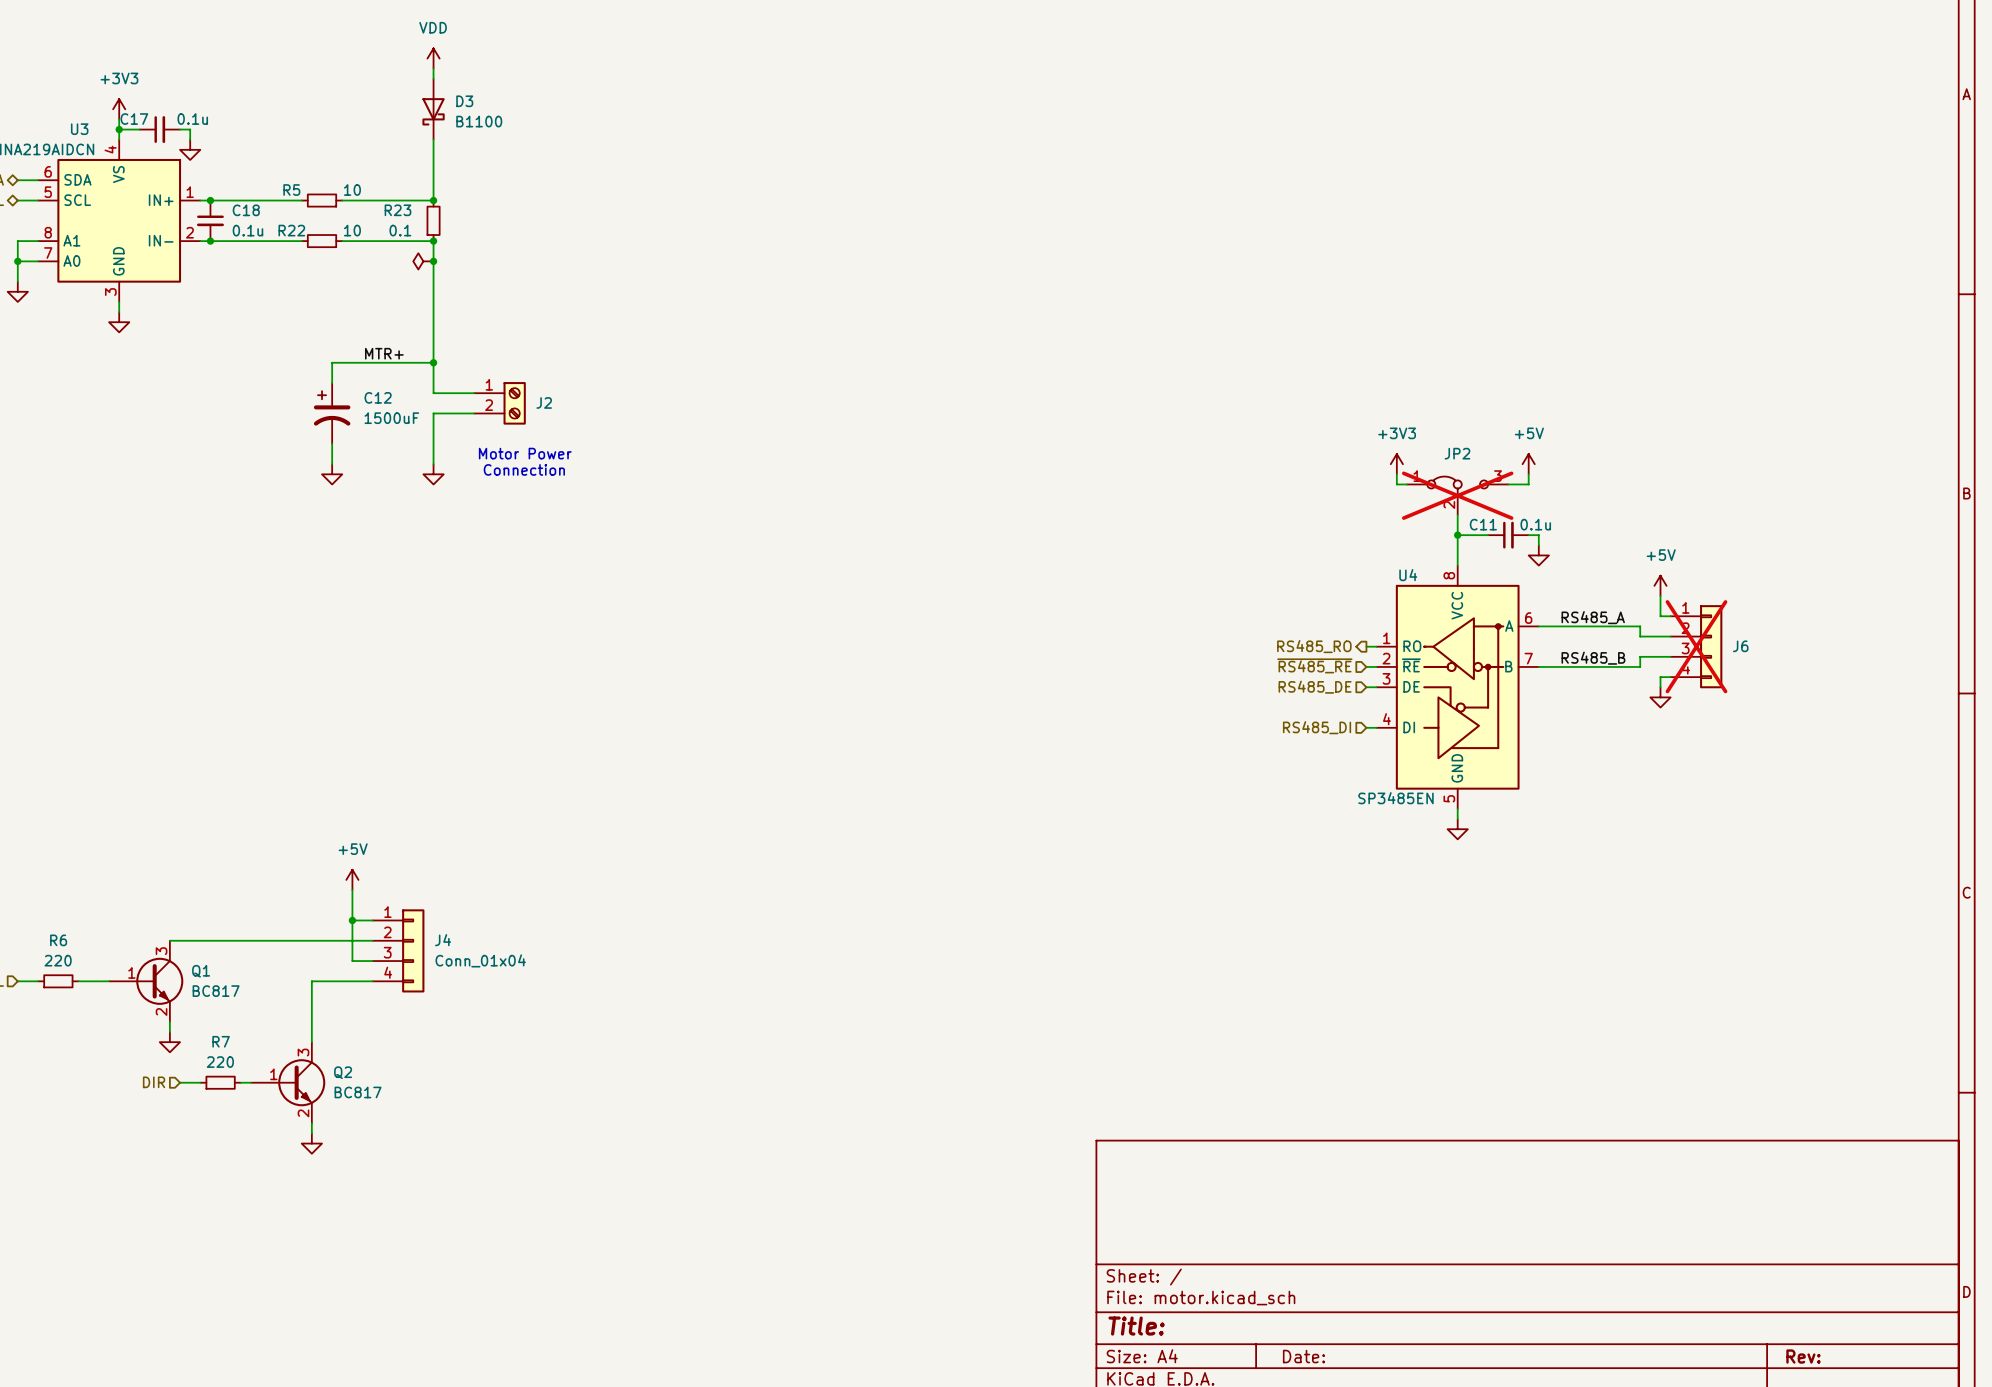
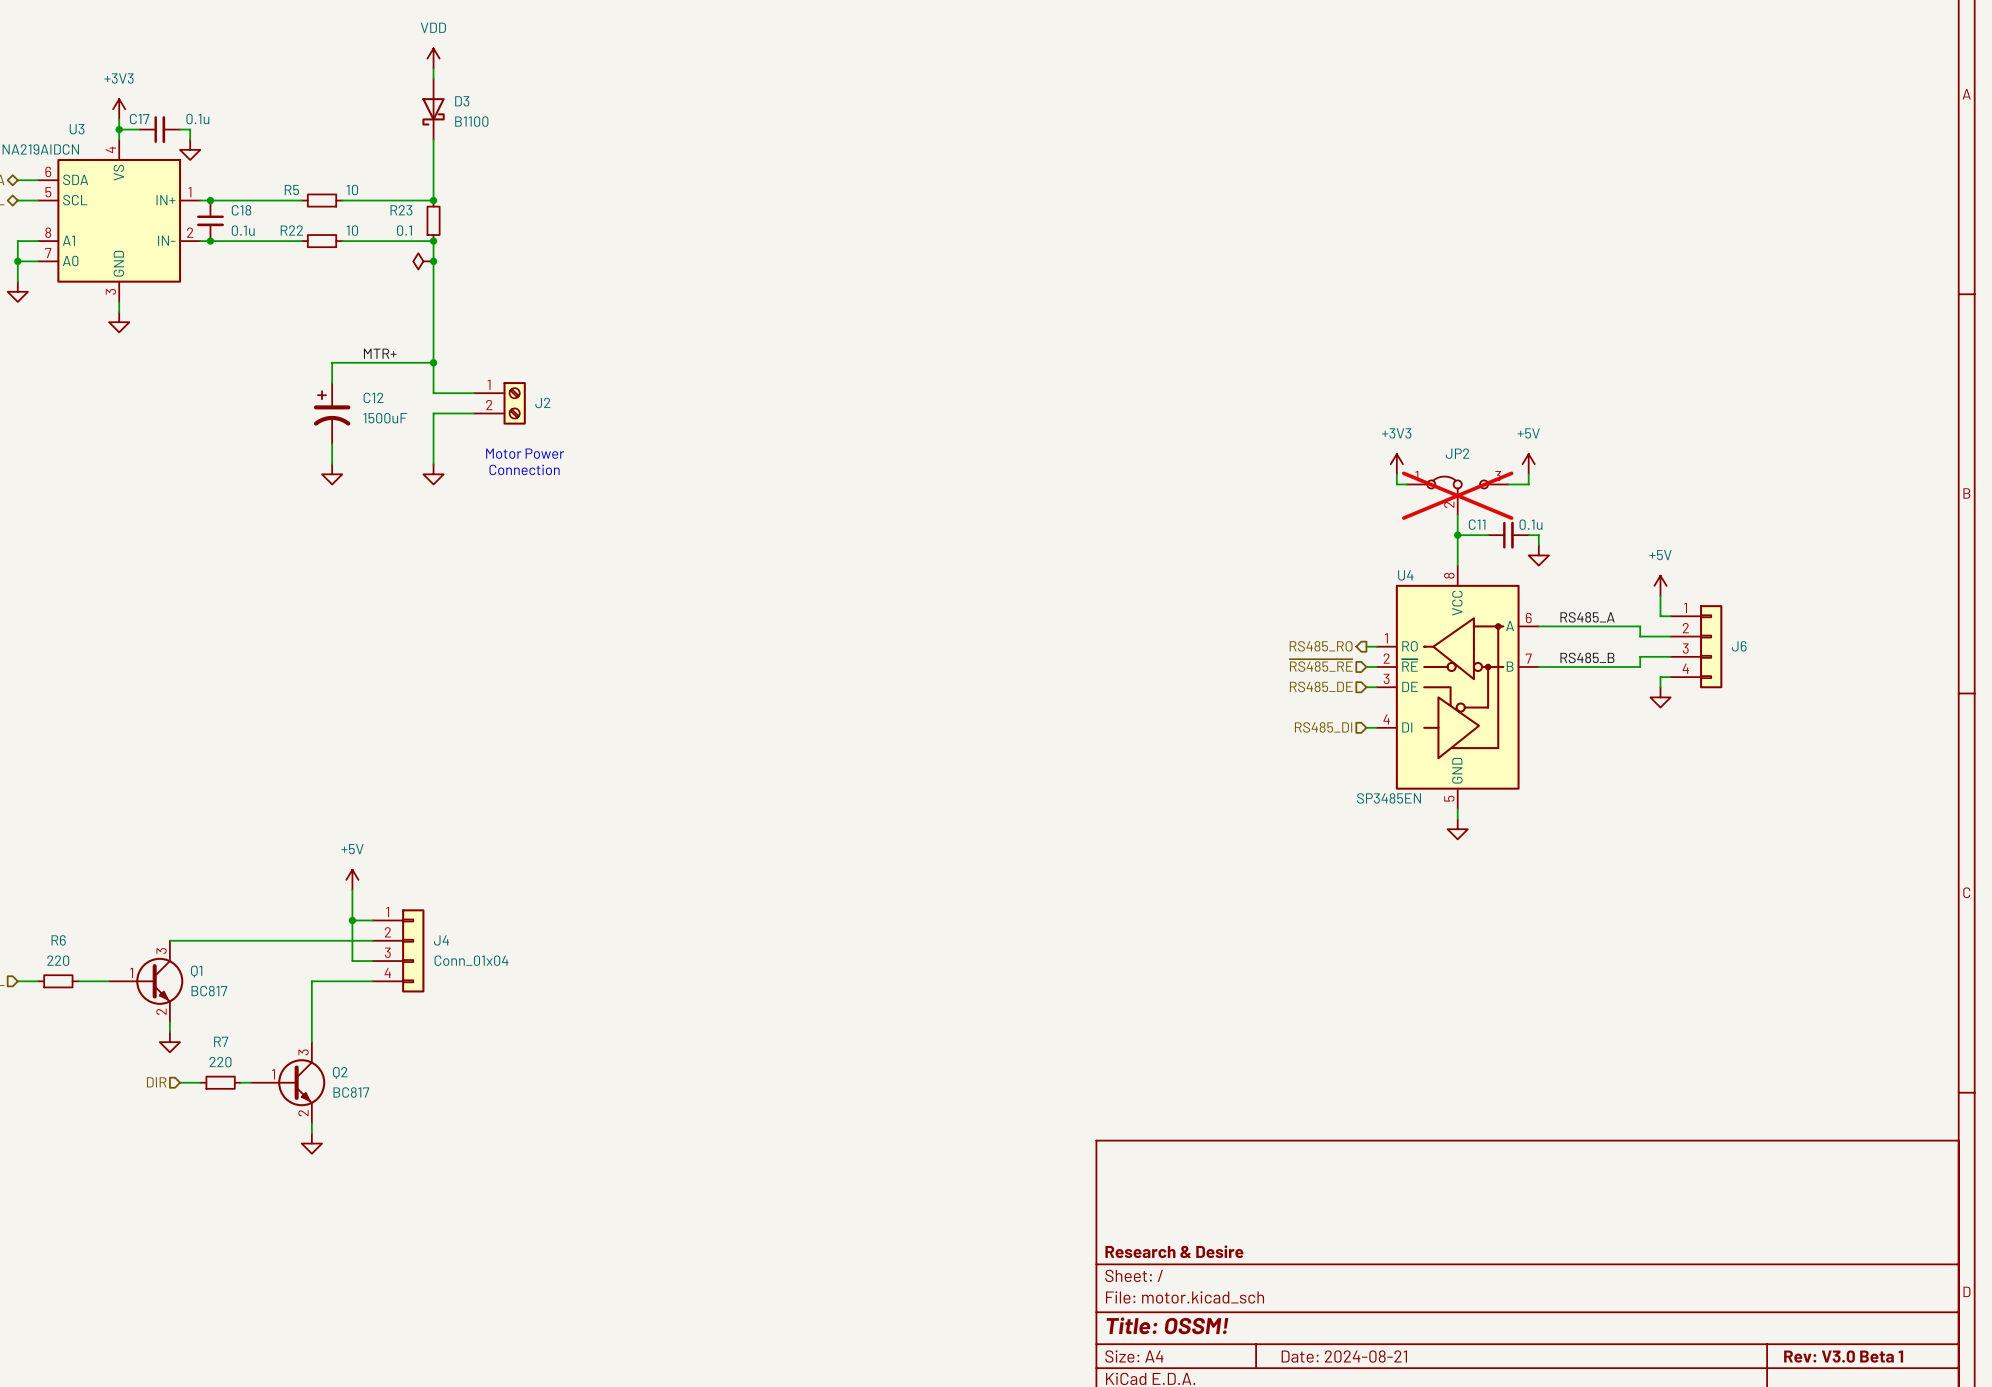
J6 do-not-place cross: (1696, 646) -> none
title block: none -> Research & Desire (1174, 1251)
title block: Title: (1136, 1326) -> Title: OSSM! (1167, 1325)
title block: Date: (1303, 1356) -> Date: 2024-08-21 (1344, 1356)
title block: Rev: (1803, 1356) -> Rev: V3.0 Beta 1 (1843, 1356)

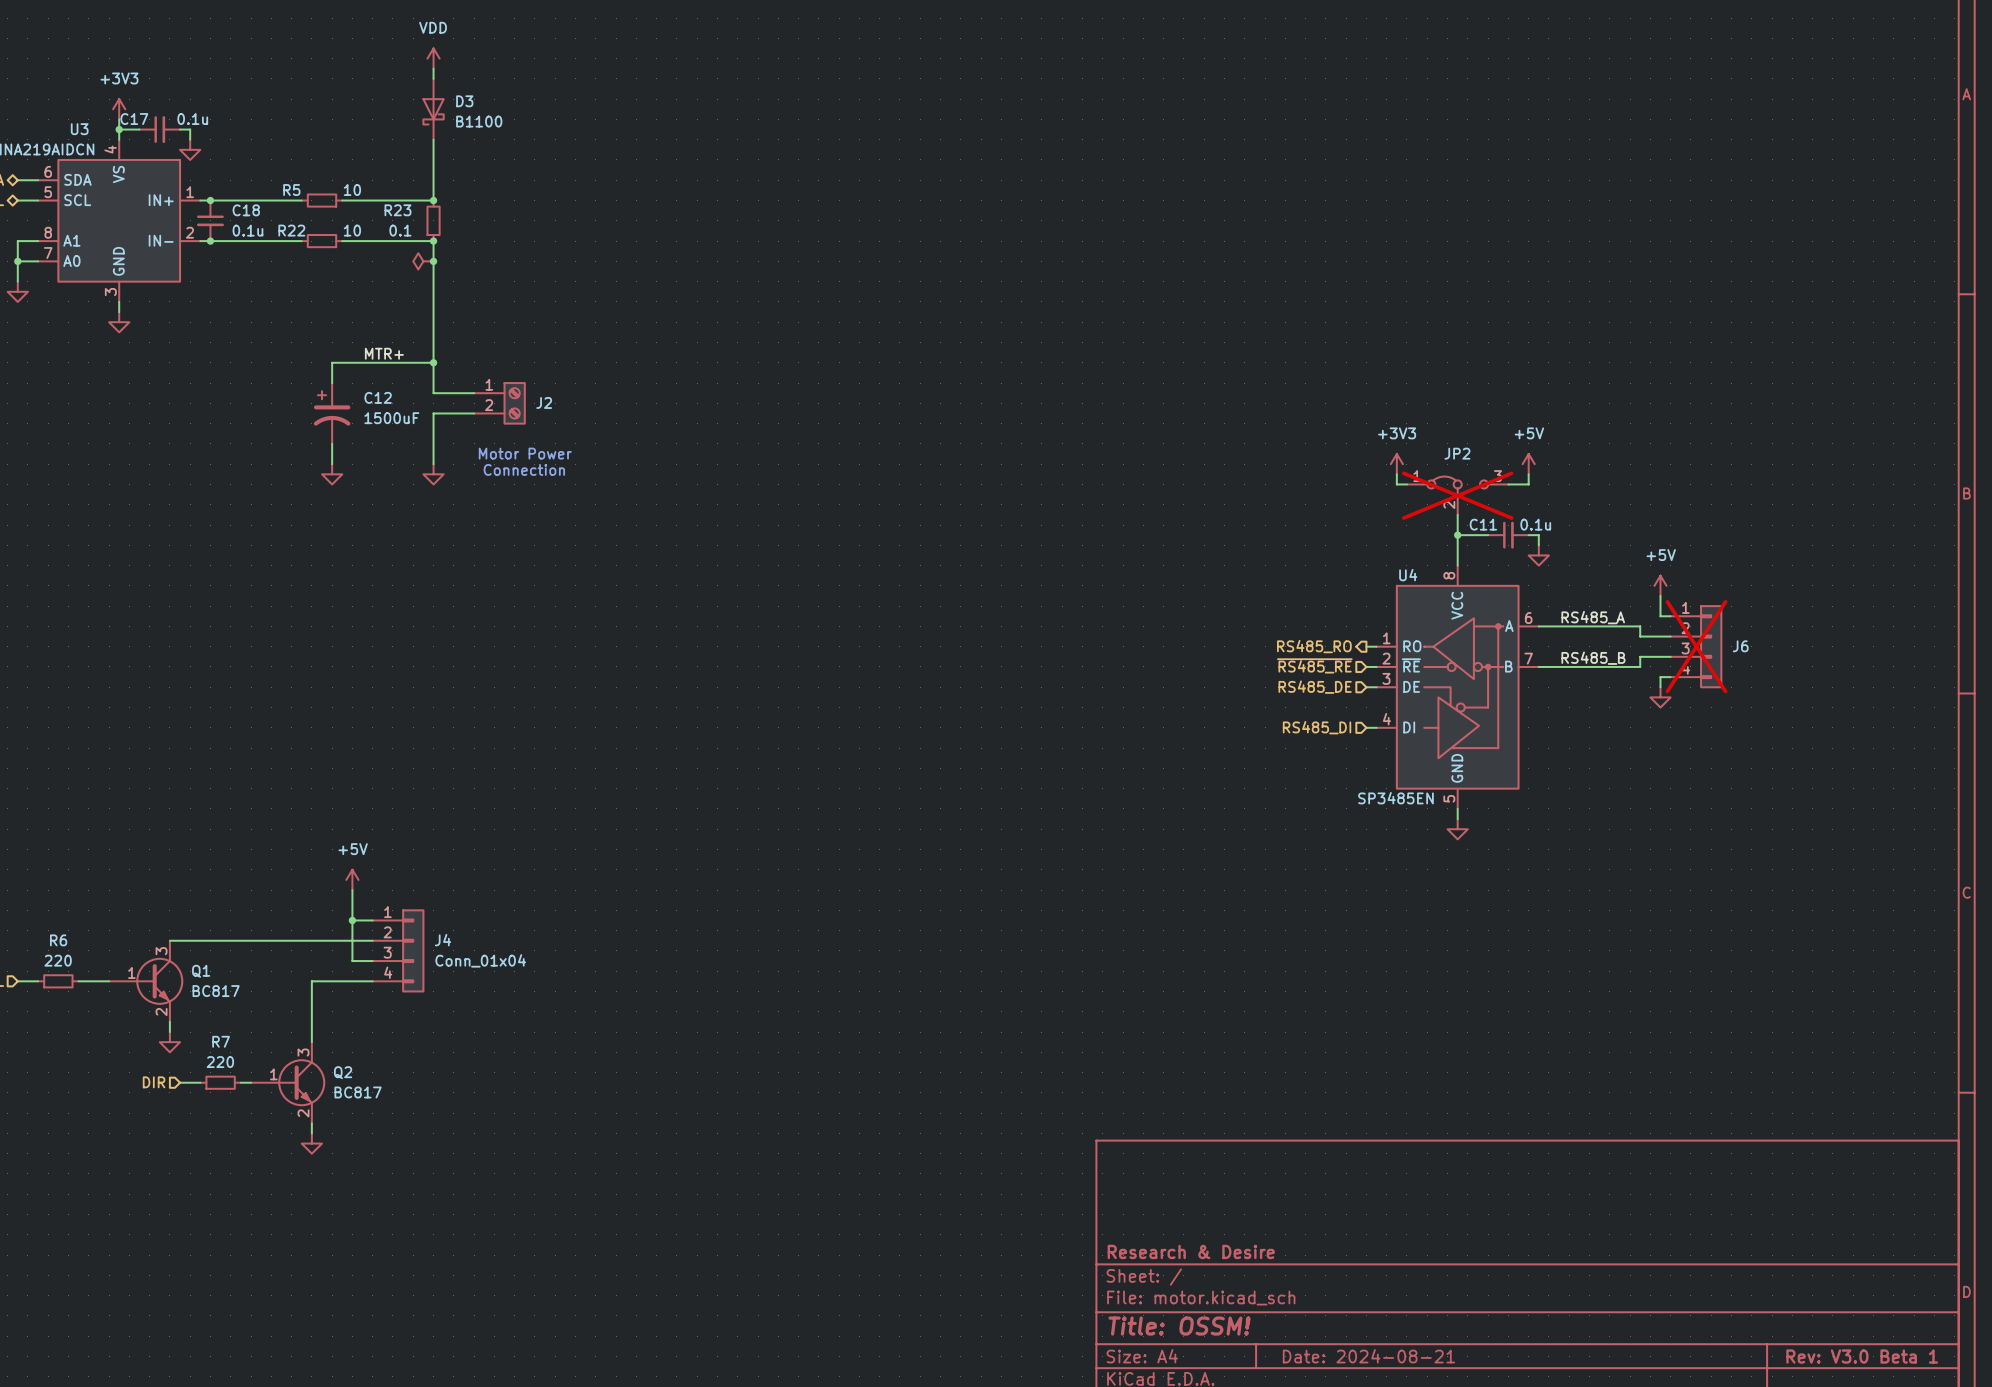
J6 do-not-place cross: none -> (1696, 646)

